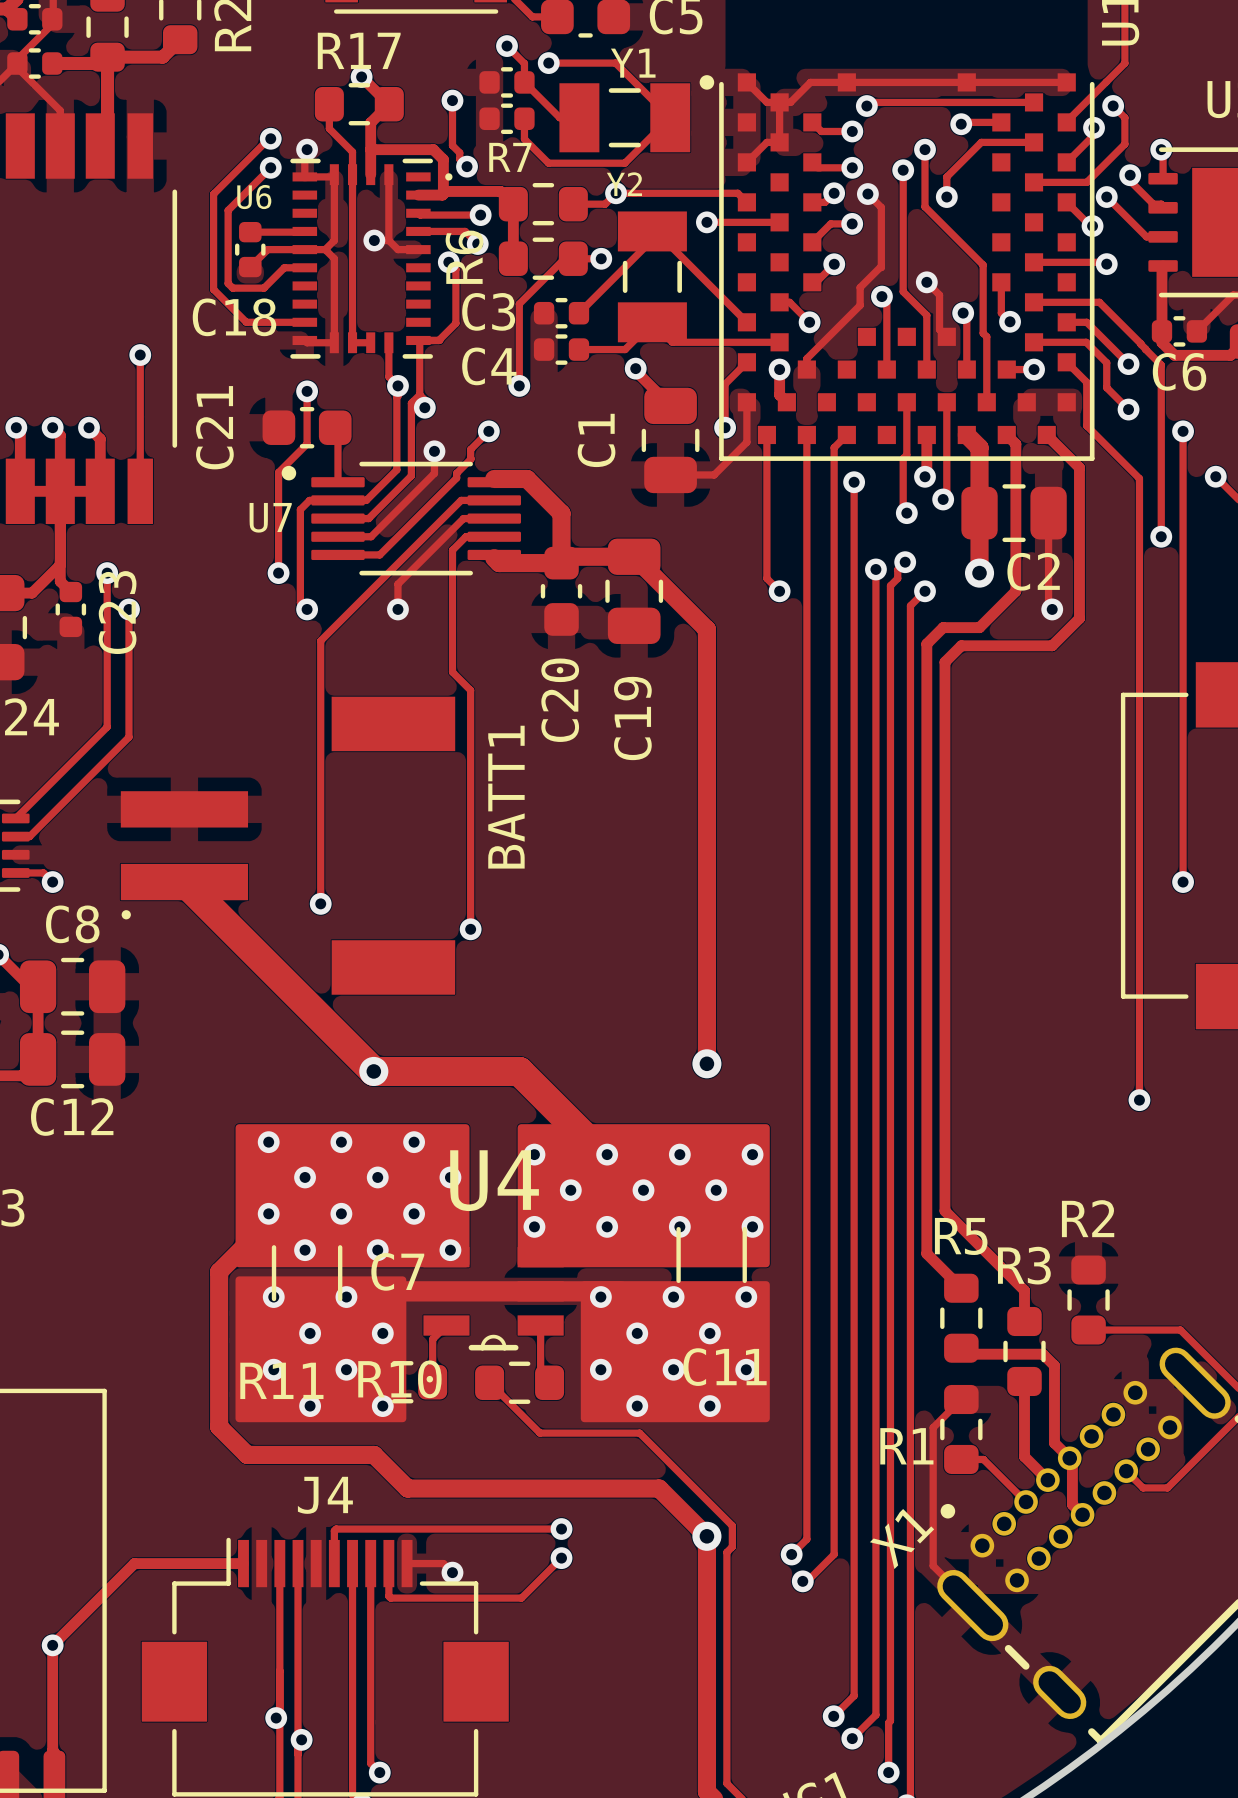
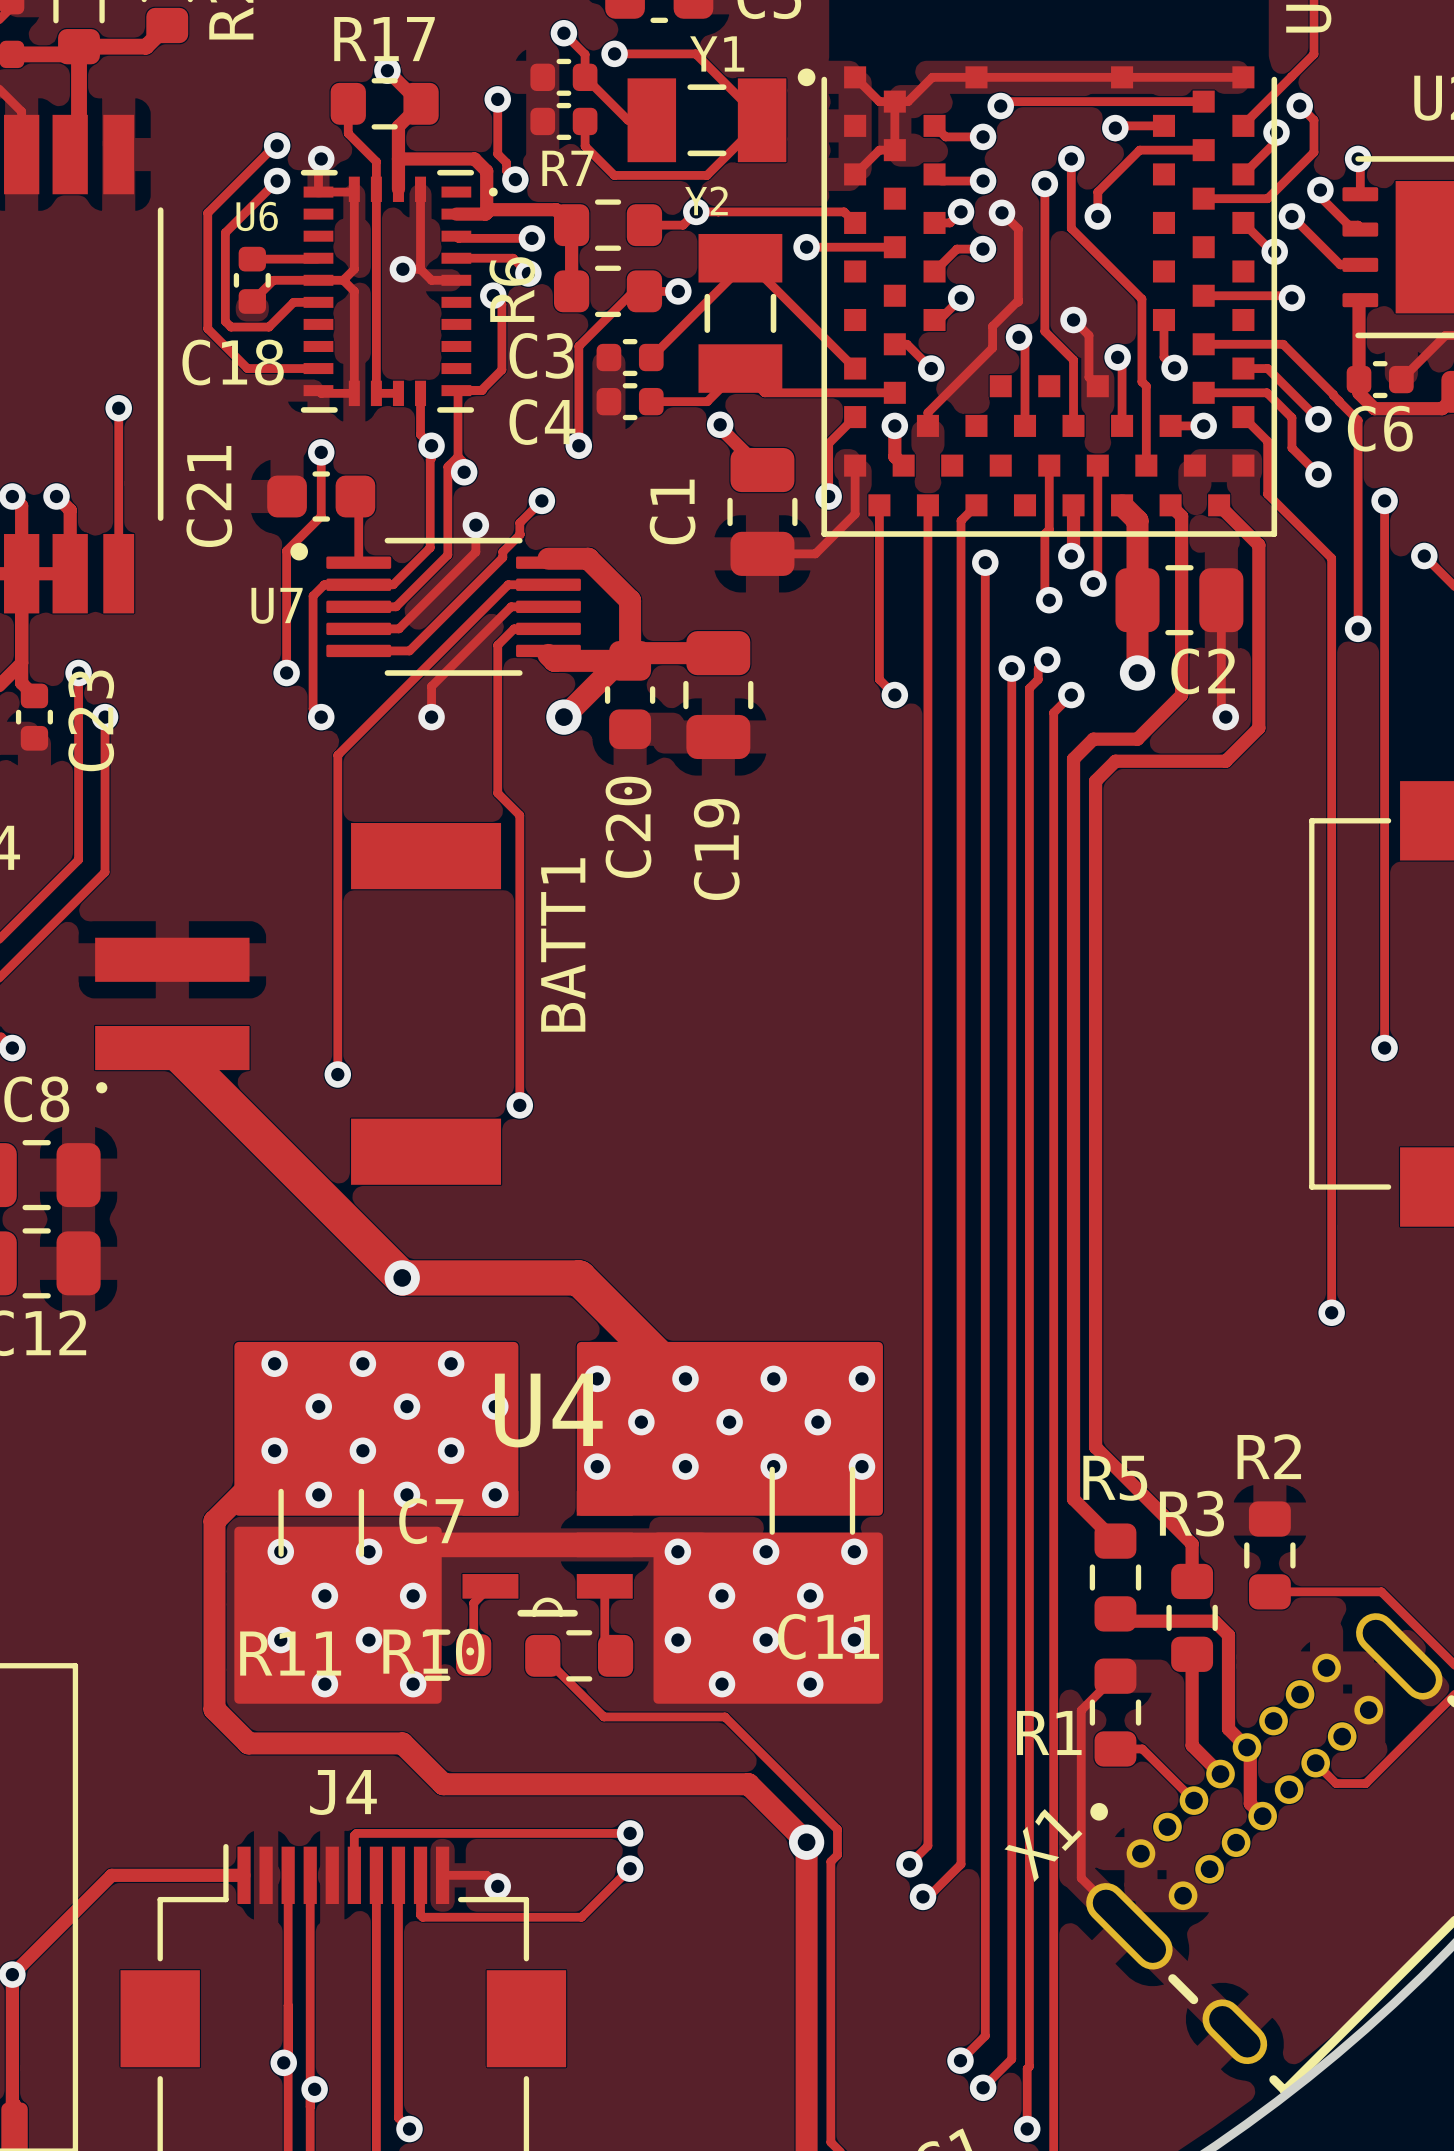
track: (634, 556) (706, 629) (706, 1063) -> none
track: none -> (620, 660) (563, 717)
via: none -> (563, 717)
via: (706, 1063) -> none

